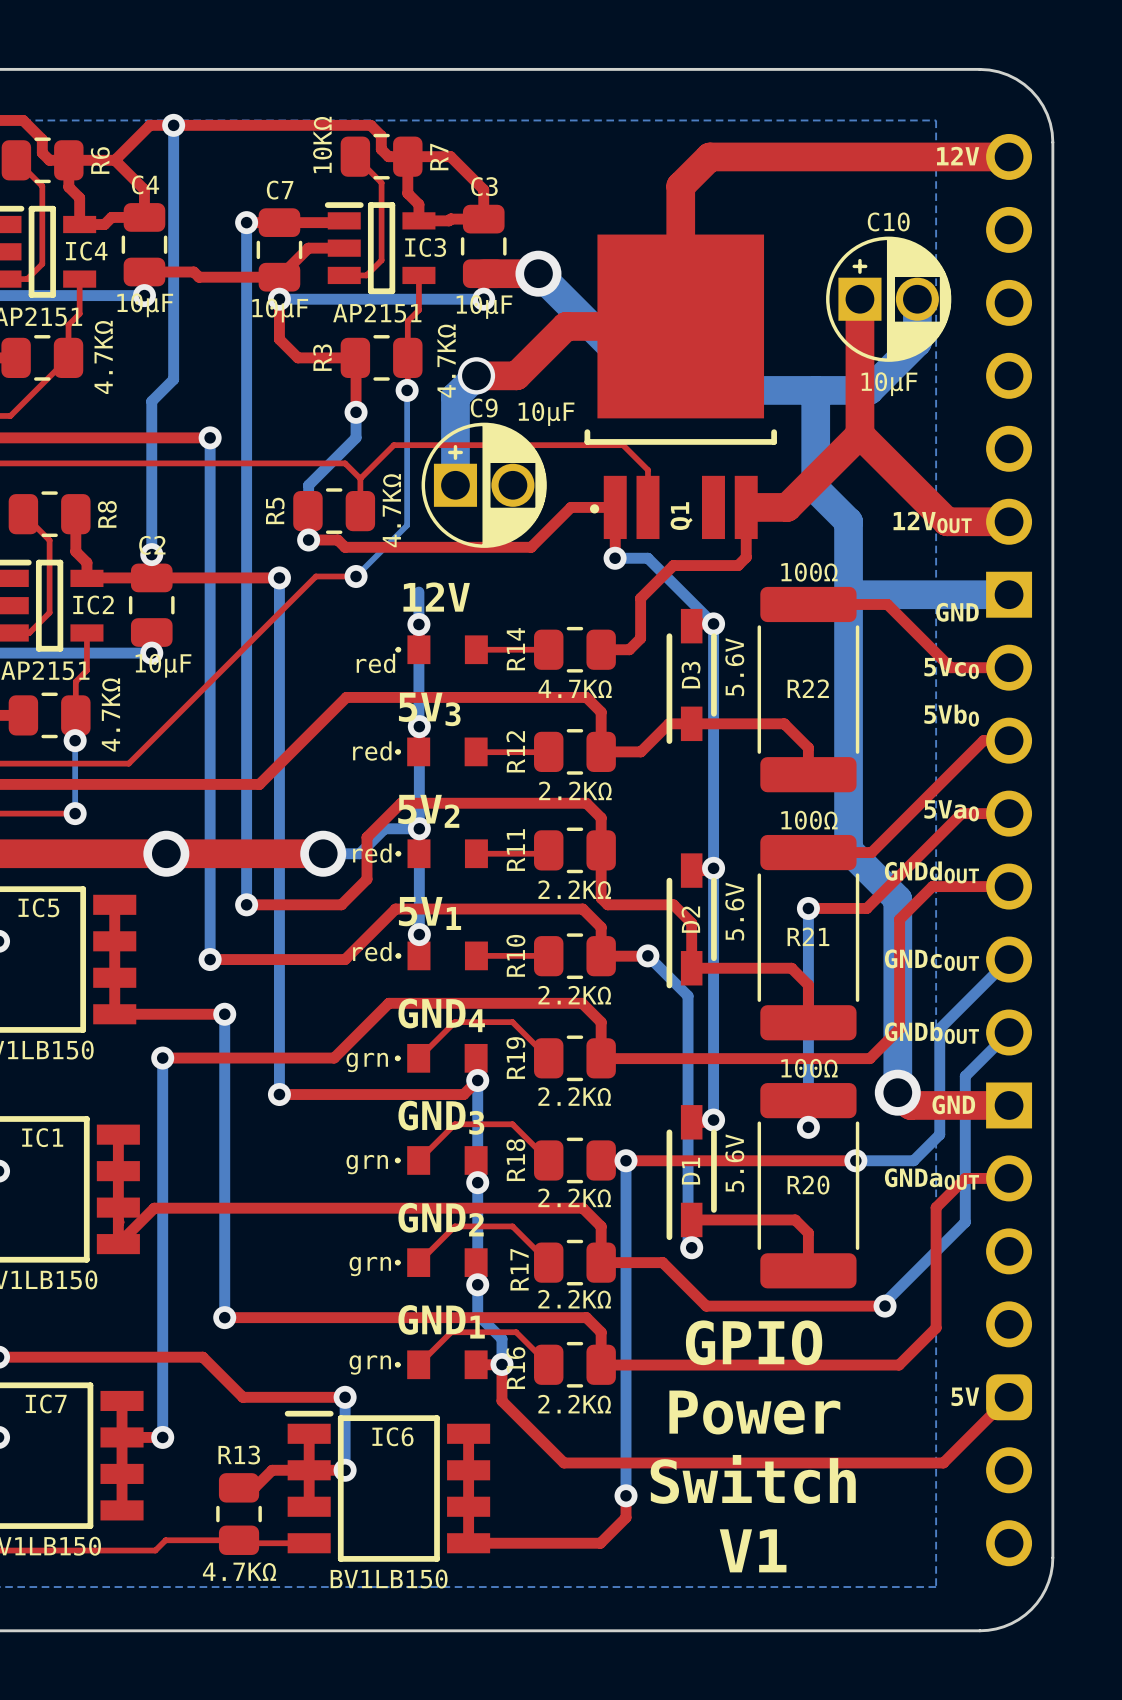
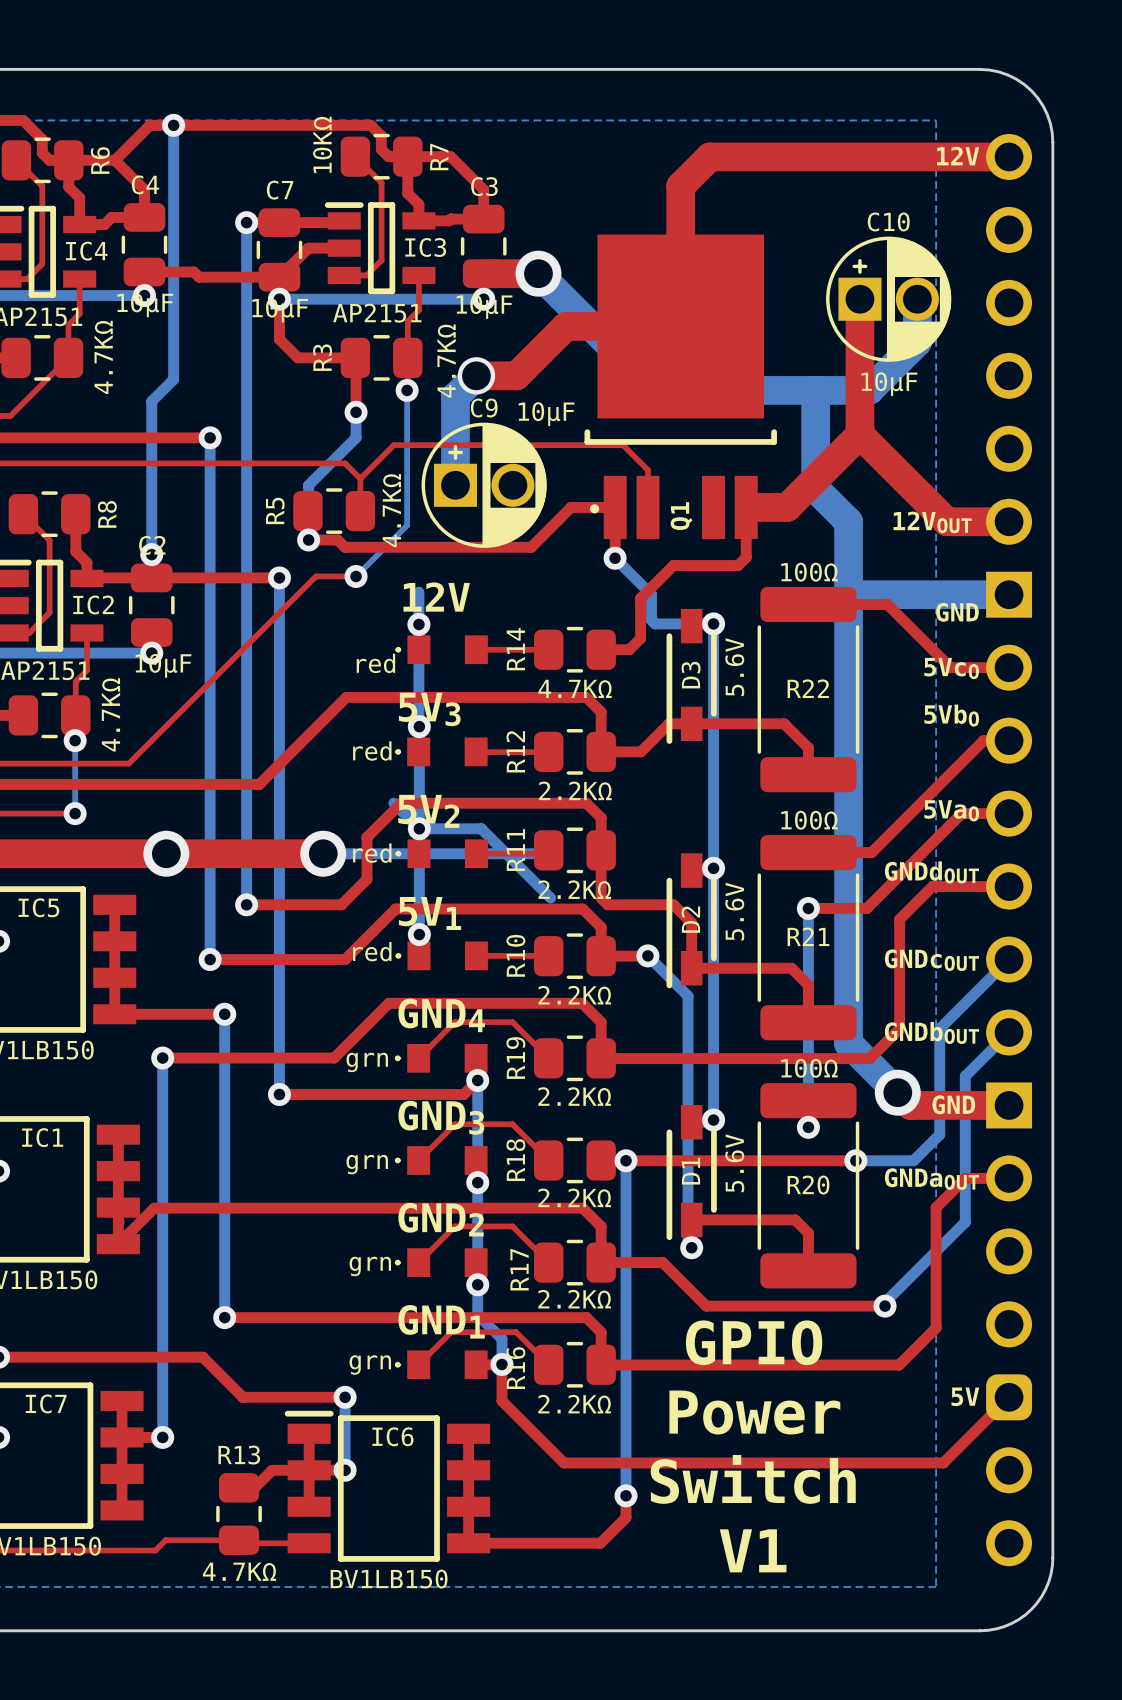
bottom track: (615, 558) (647, 558) (713, 623) -> (615, 558) (651, 594) (651, 620) (655, 623) (713, 623)
bottom track: none -> (393, 803) (419, 828) (481, 828) (550, 898)
bottom track: (419, 828) (384, 828) (359, 853) -> (542, 853) (359, 853)
bottom track: (848, 850) (897, 899) (897, 1092) -> (848, 850) (848, 1043) (897, 1092)

